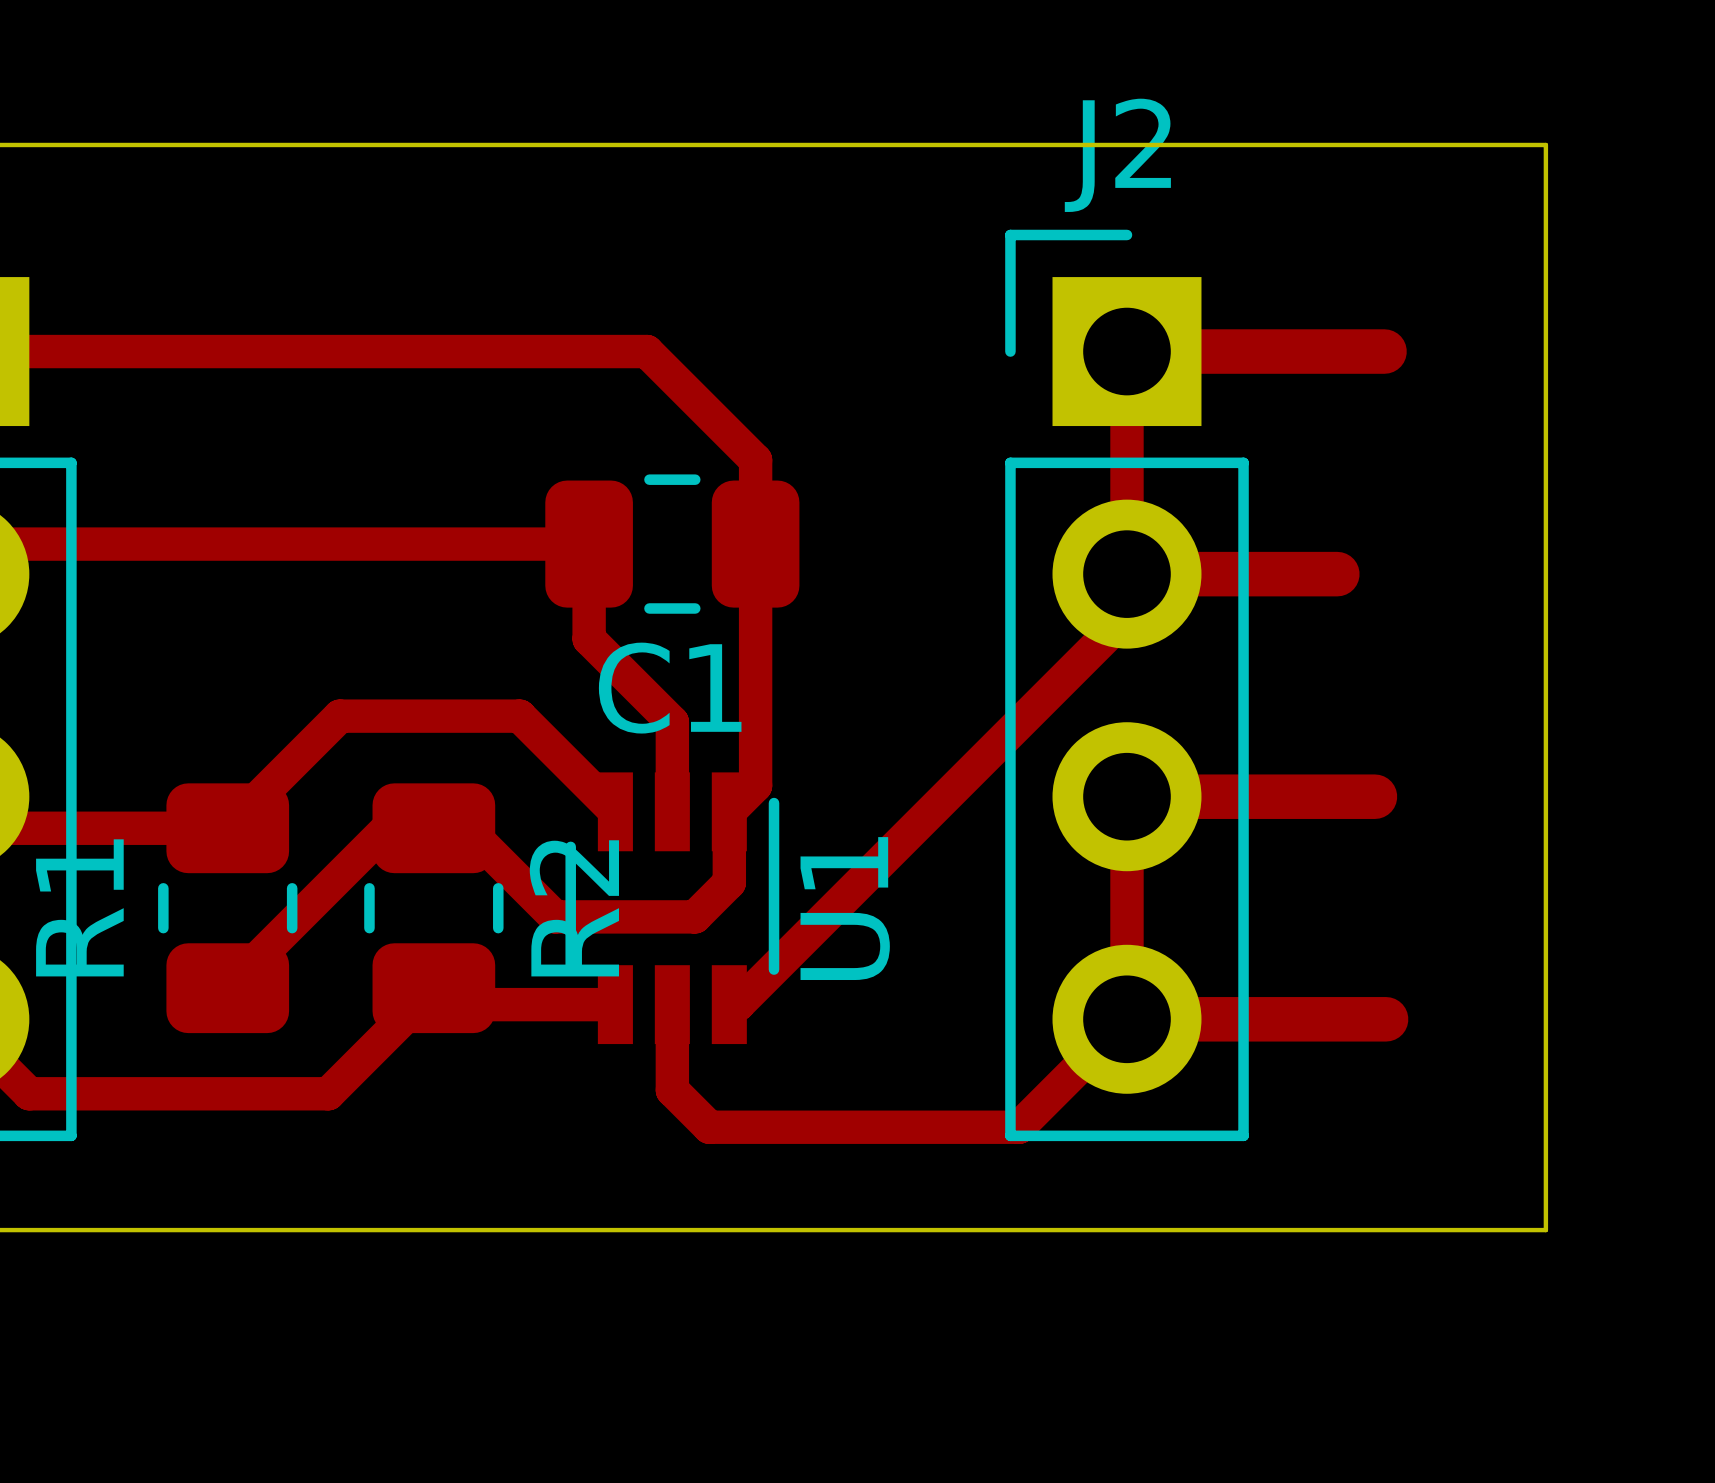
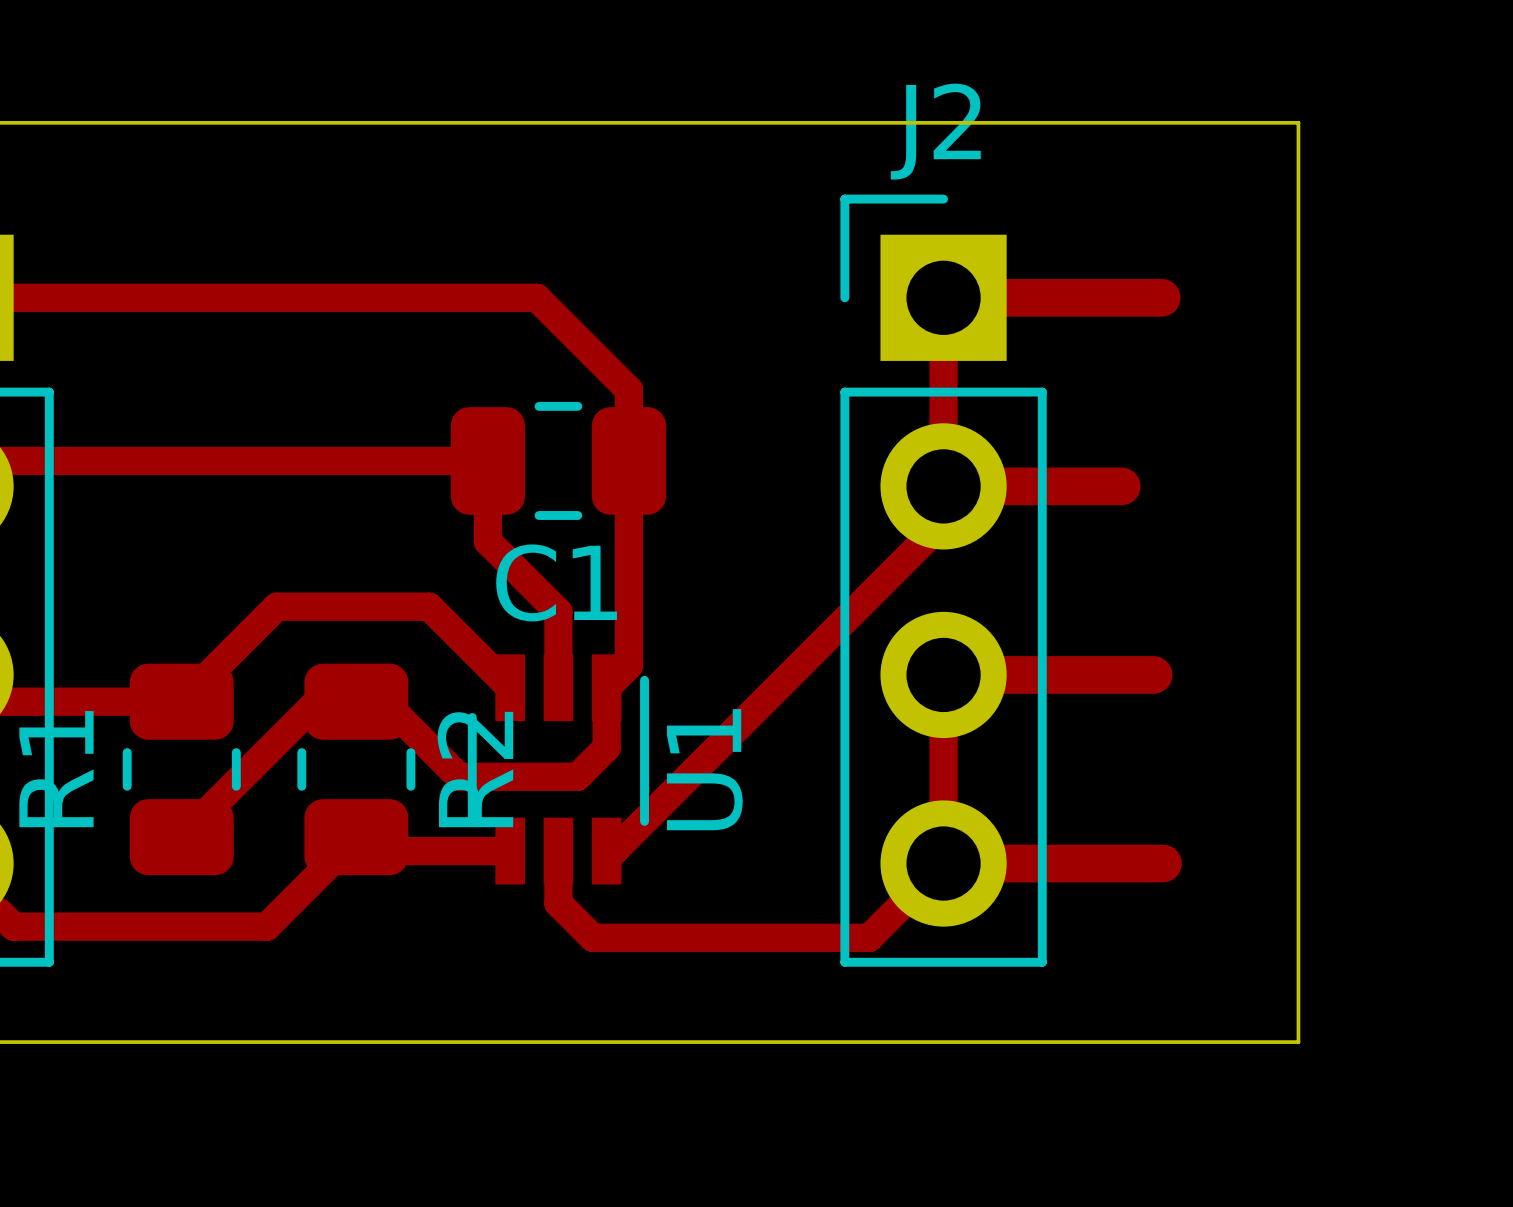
track: (672, 1066) (672, 1090) (709, 1127) (1019, 1127) (1039, 1106) -> (558, 903) (592, 937) (869, 937)

